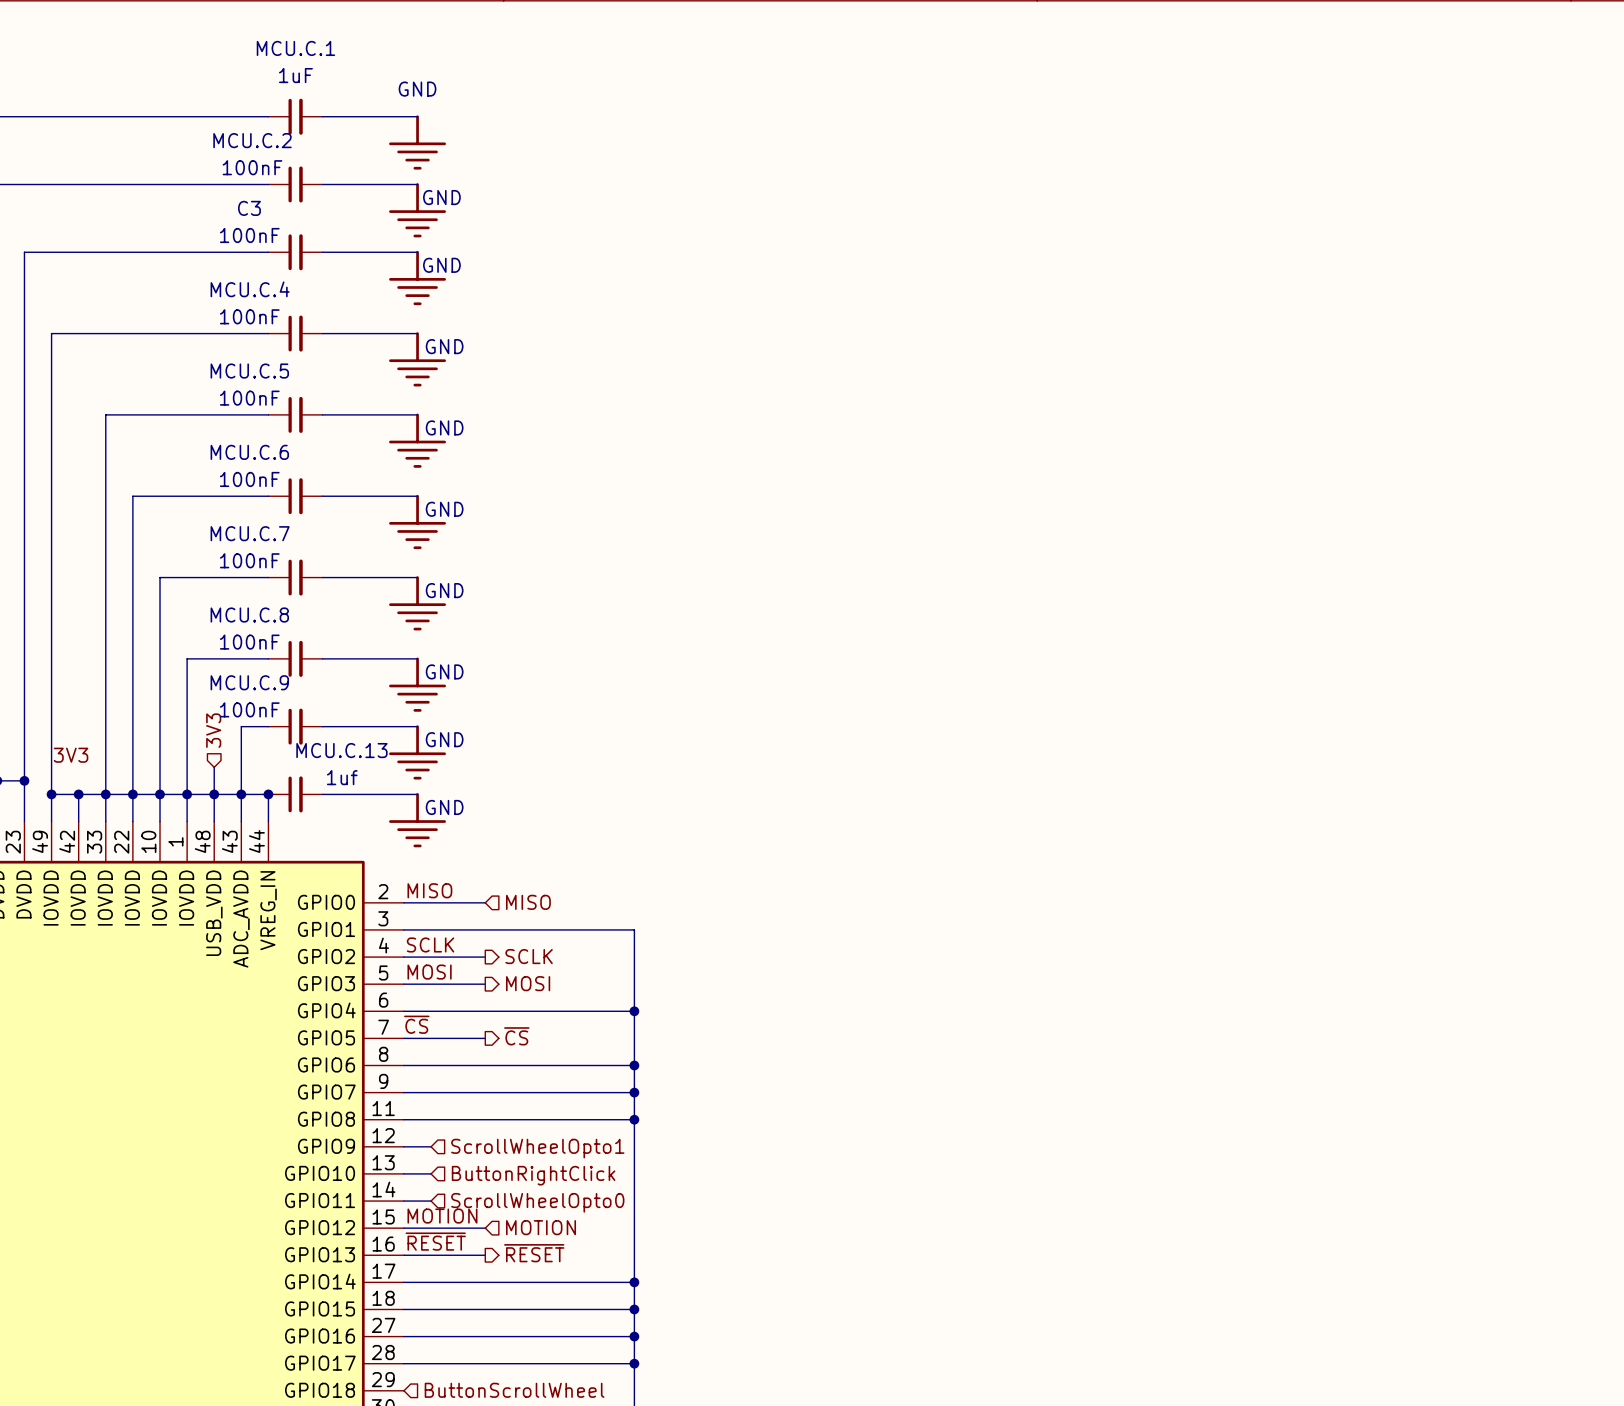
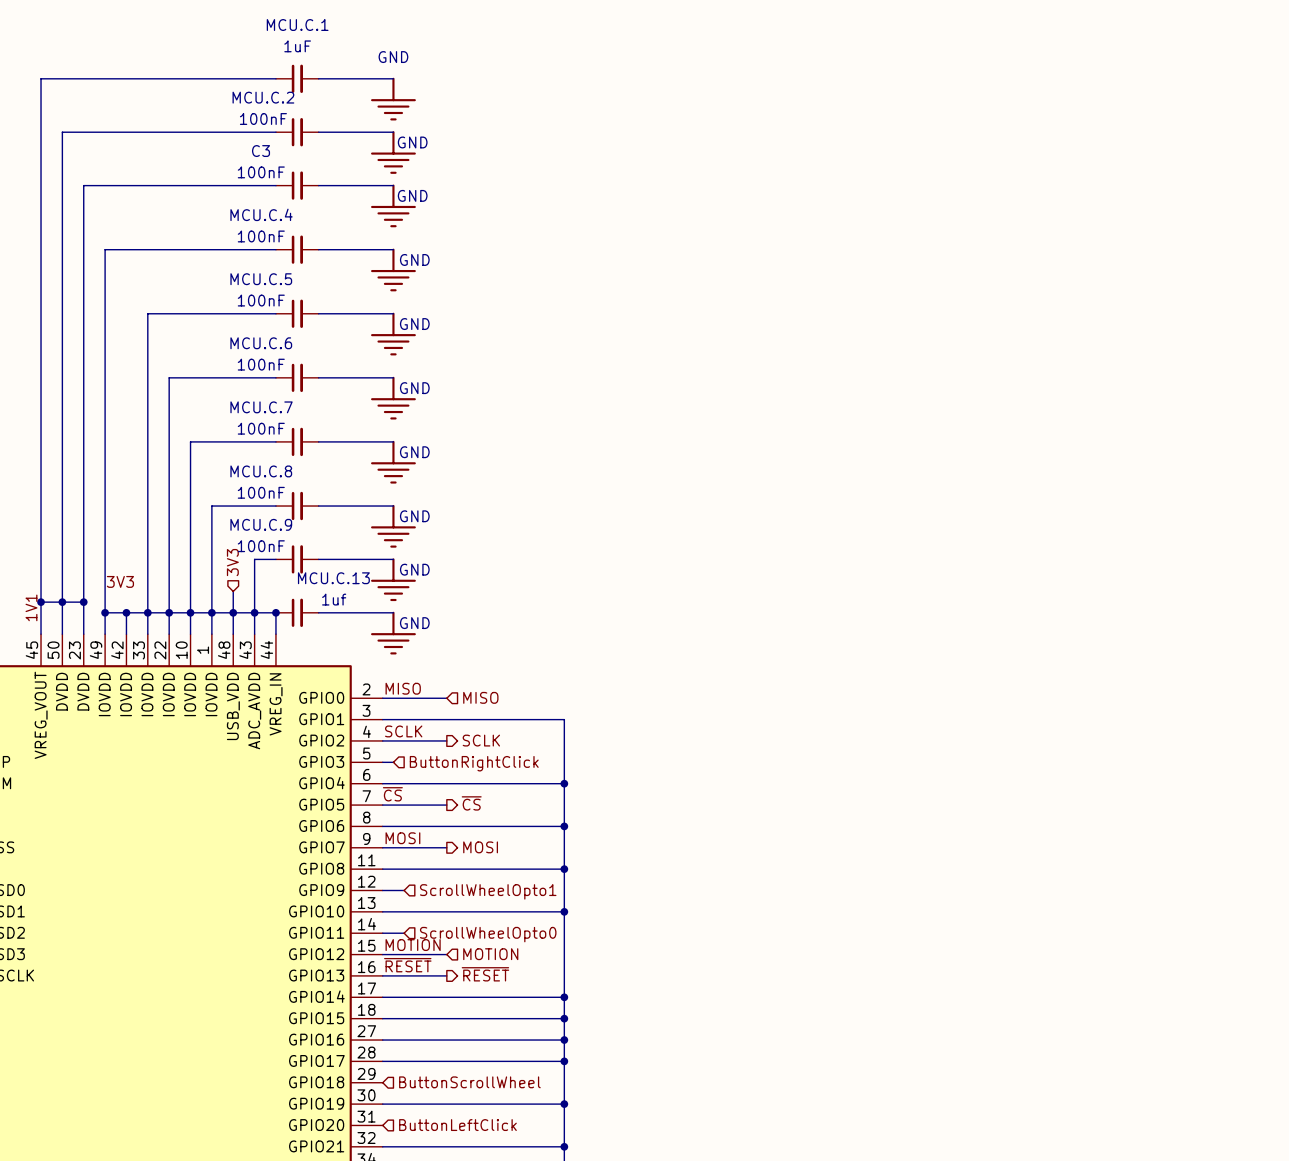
label position: MOSI (429, 972) -> MOSI (402, 838)
hierarchical label position: MOSI (528, 983) -> MOSI (480, 847)
wire: (417, 984) (485, 984) -> none
wire: (485, 1092) (634, 1092) -> none
junction: (634, 1092) -> none
wire: none -> (404, 911) (564, 911)
junction: none -> (564, 911)
hierarchical label position: ButtonRightClick (533, 1175) -> ButtonRightClick (474, 763)

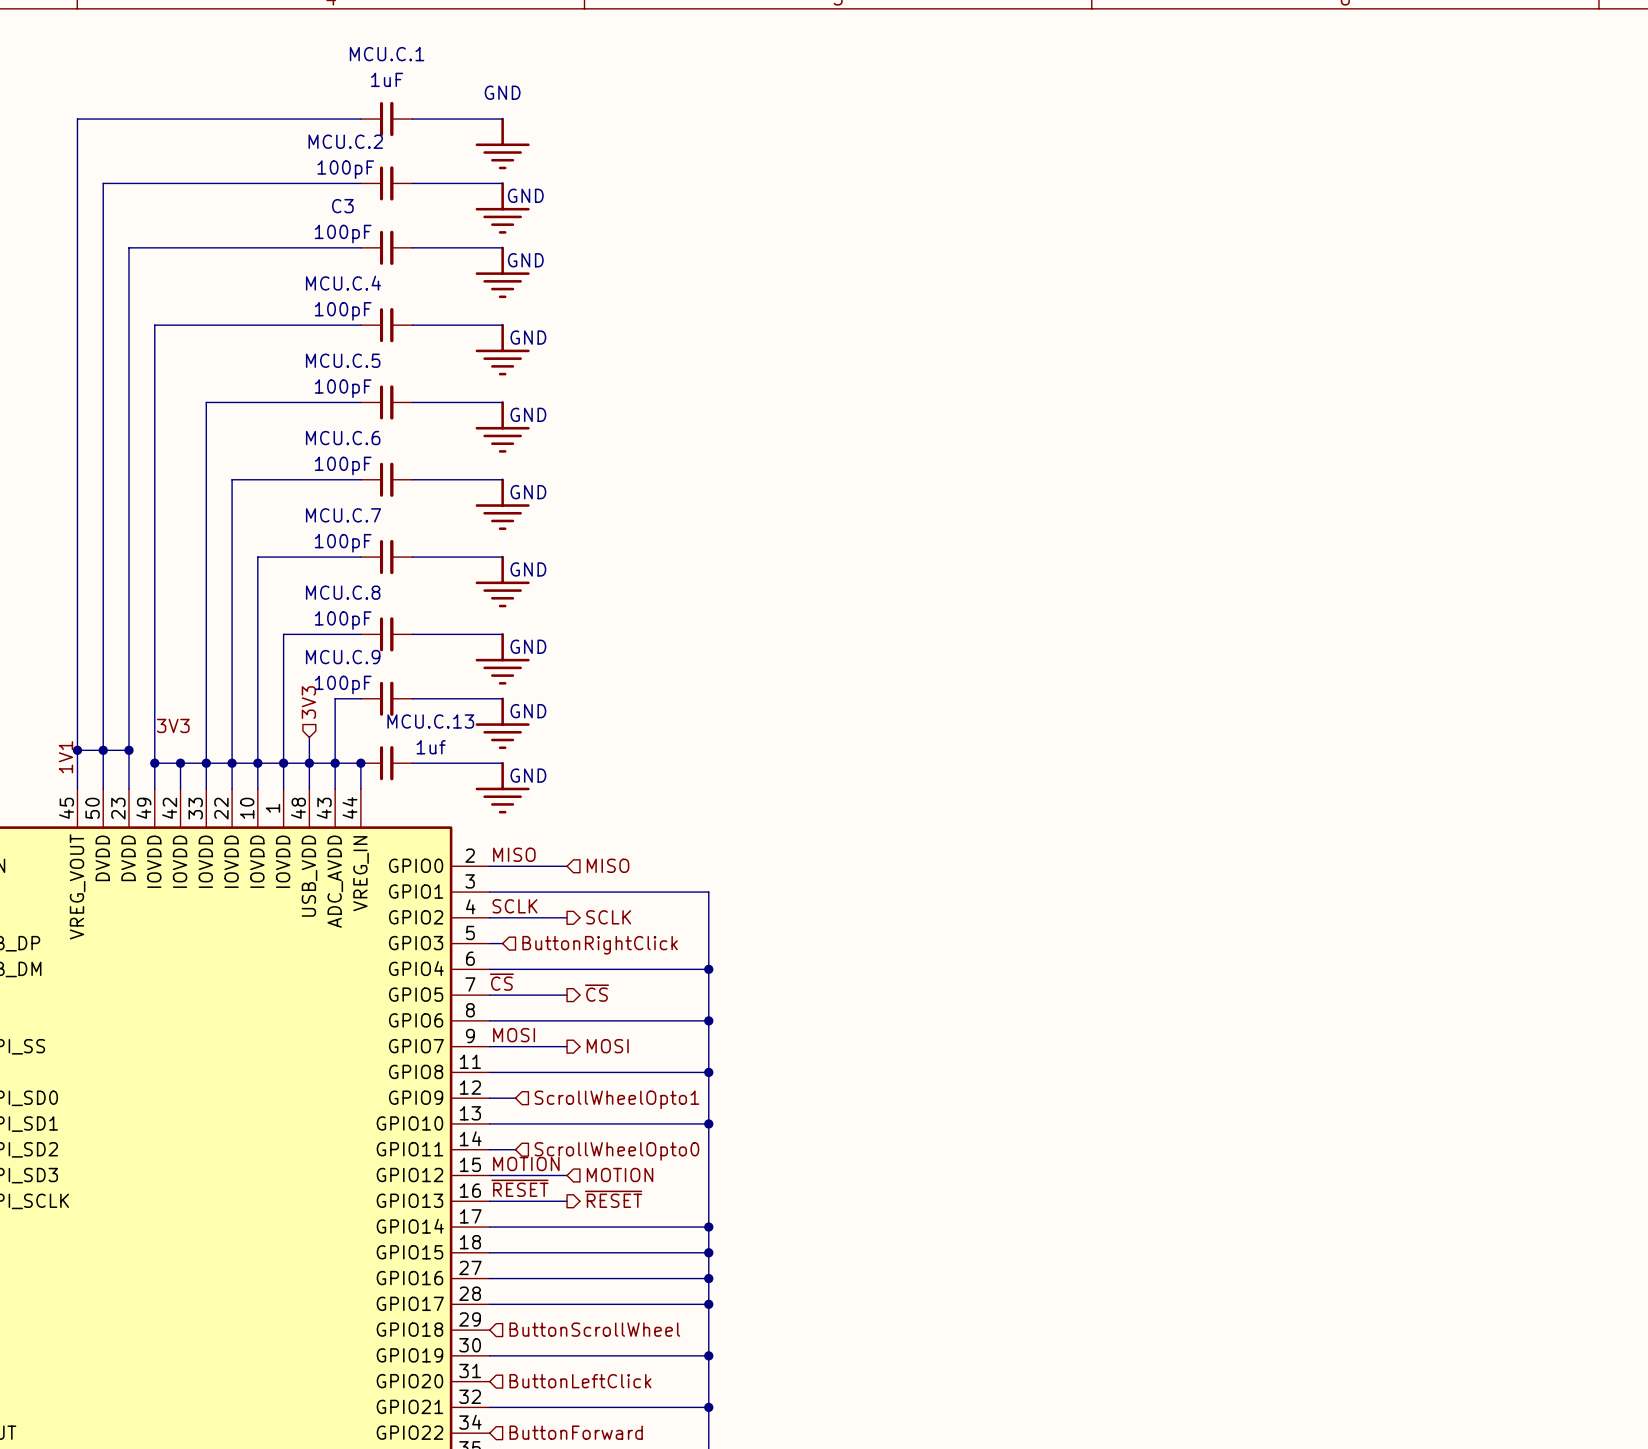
MCU.C.2 value: 100nF (263, 118) -> 100pF (345, 169)
C3 value: 100nF (261, 172) -> 100pF (343, 234)
MCU.C.4 value: 100nF (261, 236) -> 100pF (343, 311)
MCU.C.5 value: 100nF (261, 300) -> 100pF (343, 388)
MCU.C.6 value: 100nF (261, 364) -> 100pF (343, 465)
MCU.C.7 value: 100nF (261, 428) -> 100pF (343, 543)
MCU.C.8 value: 100nF (261, 492) -> 100pF (343, 620)
MCU.C.9 value: 100nF (261, 546) -> 100pF (343, 684)

